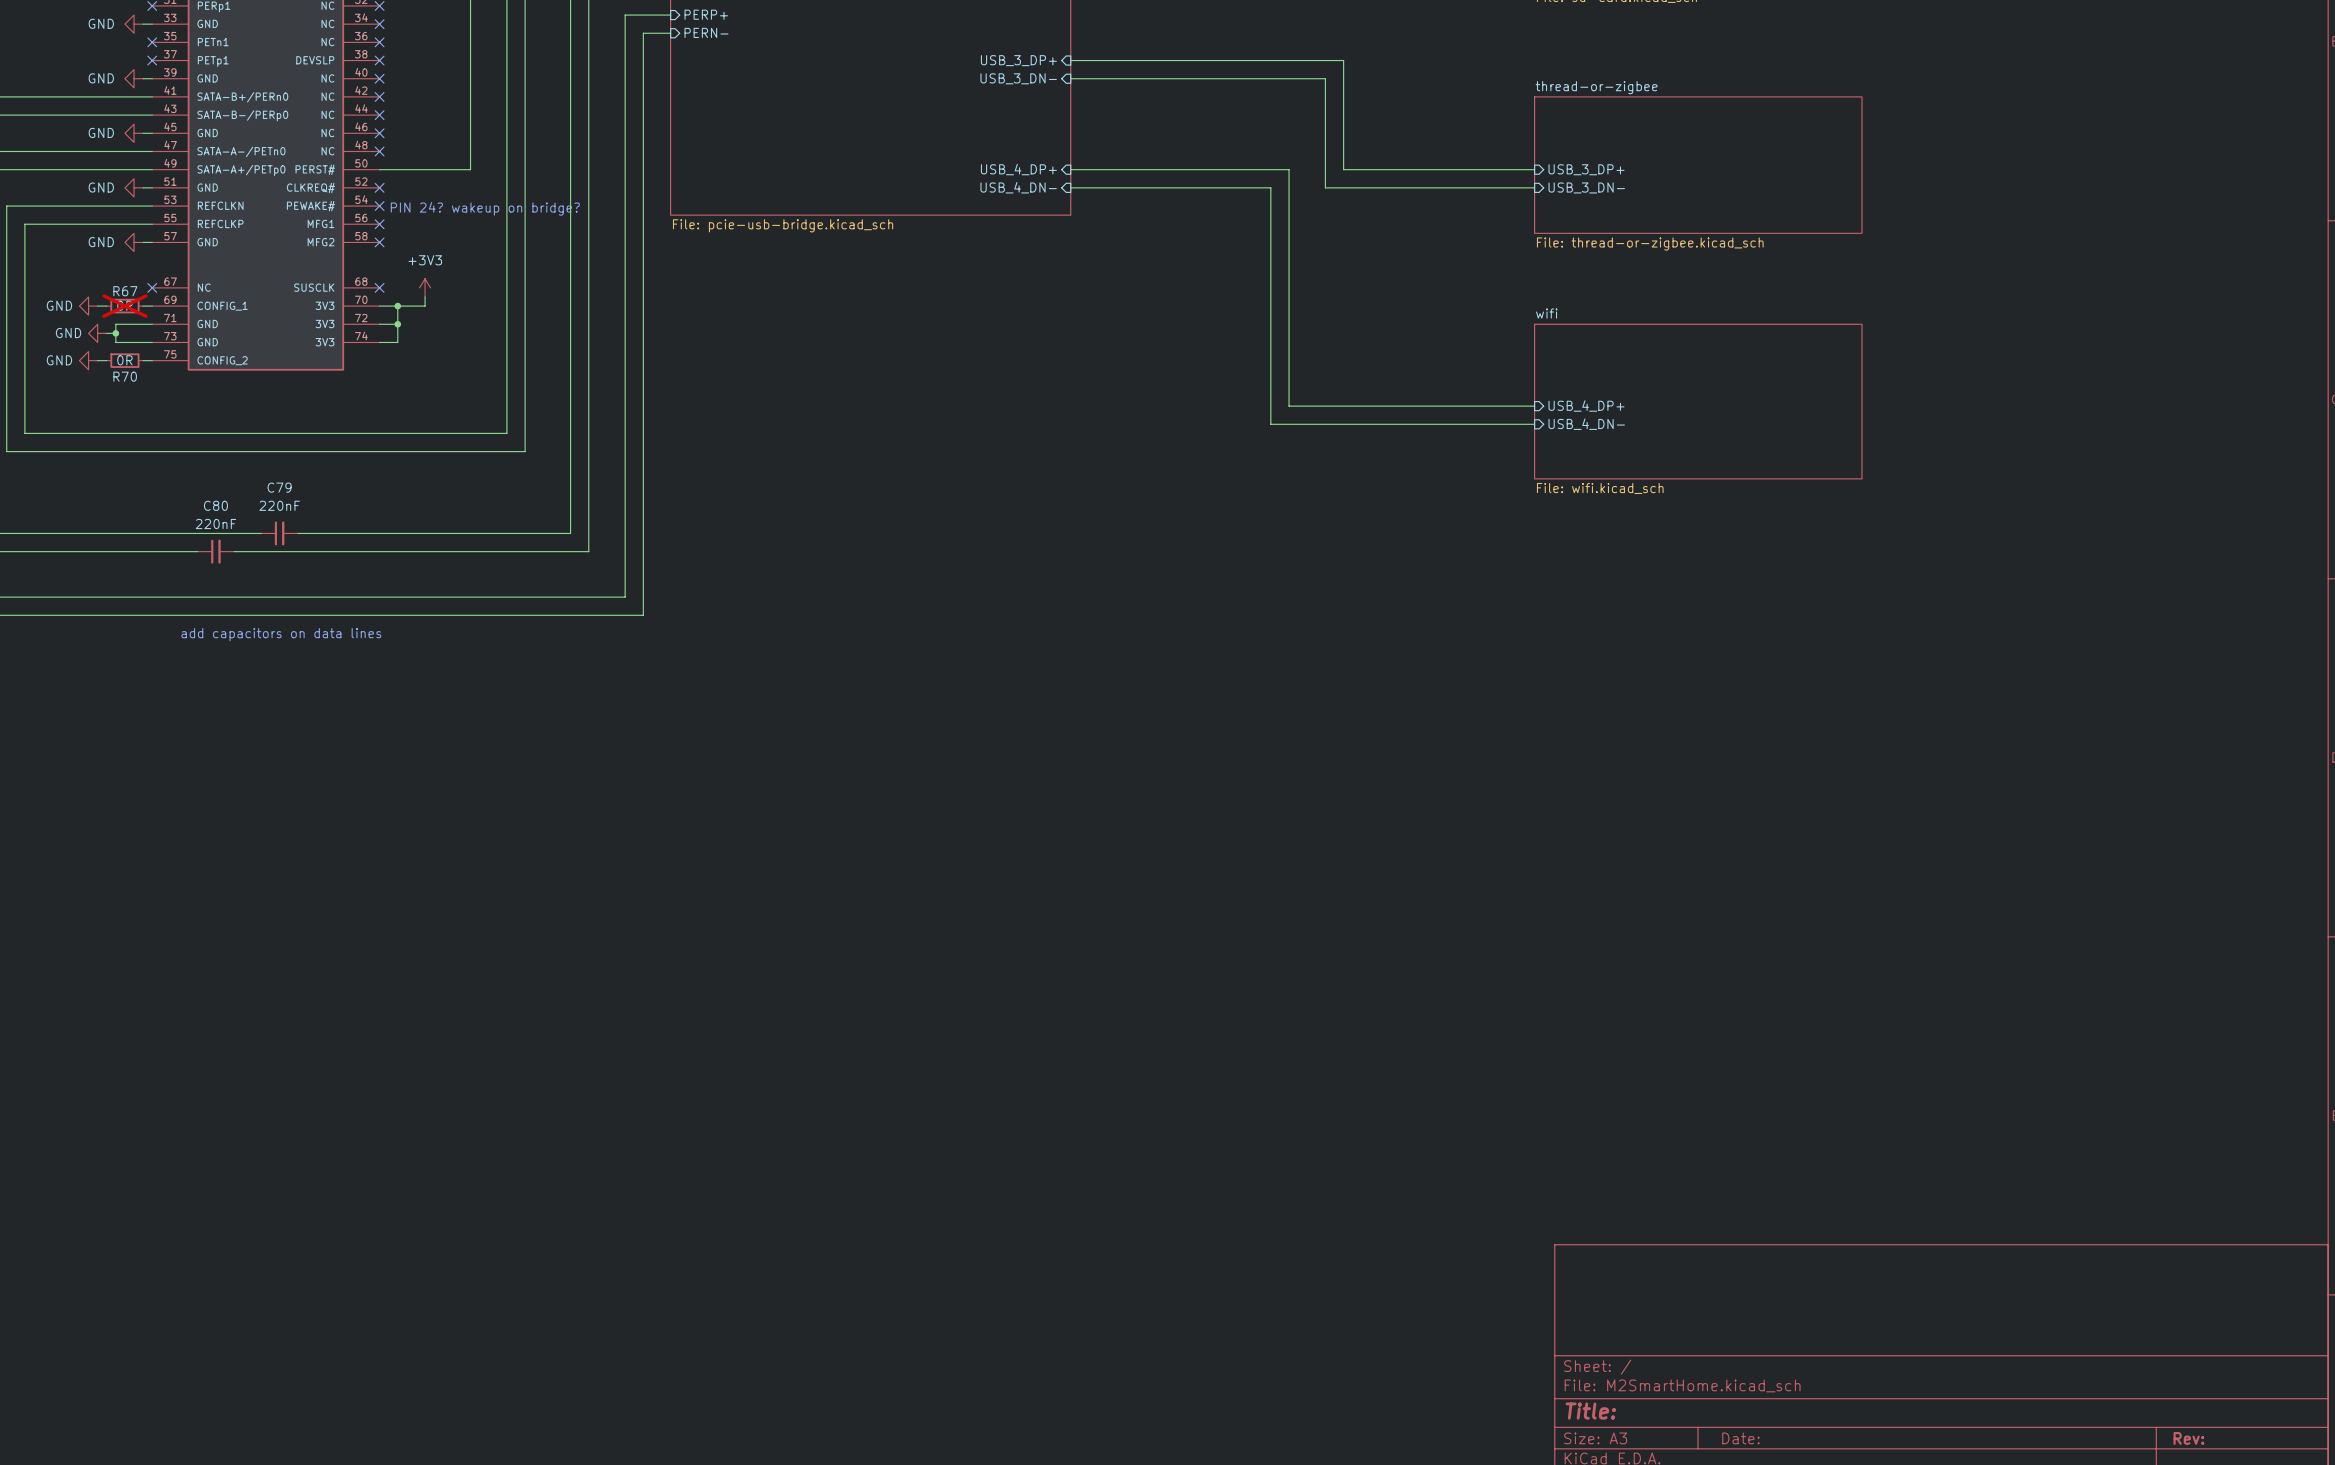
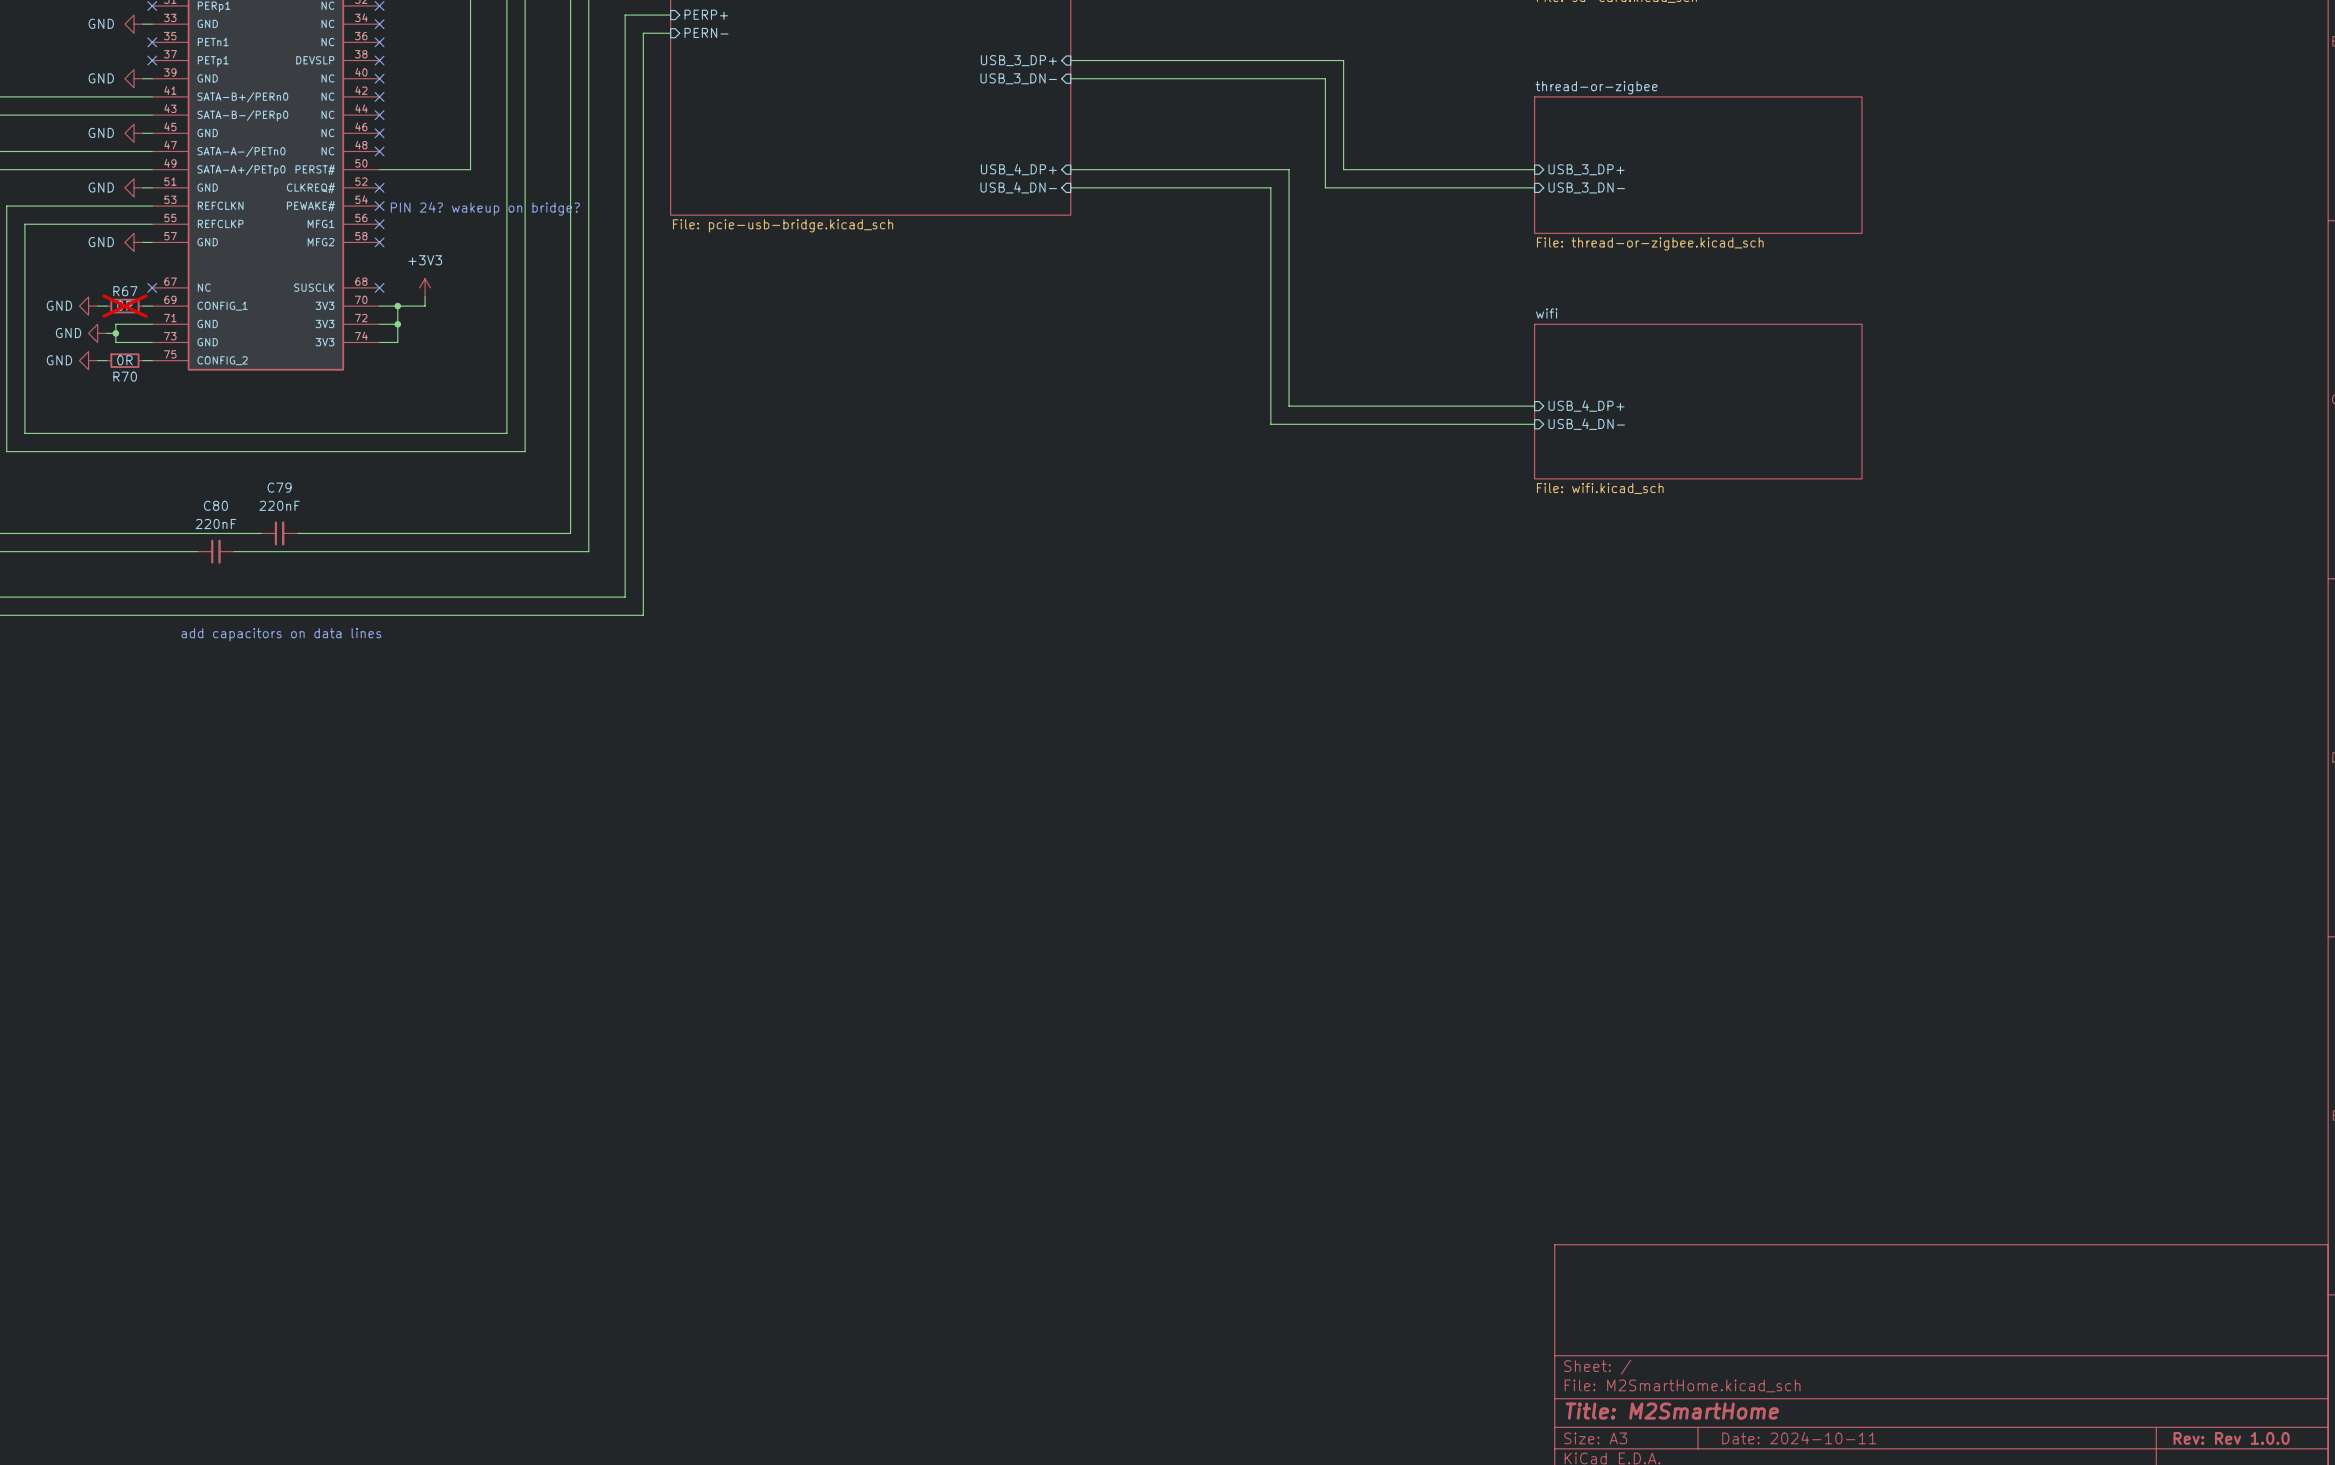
title block: Title: (1590, 1411) -> Title: M2SmartHome (1672, 1411)
title block: Date: (1740, 1438) -> Date: 2024-10-11 (1799, 1438)
title block: Rev: (2188, 1438) -> Rev: Rev 1.0.0 (2231, 1438)

